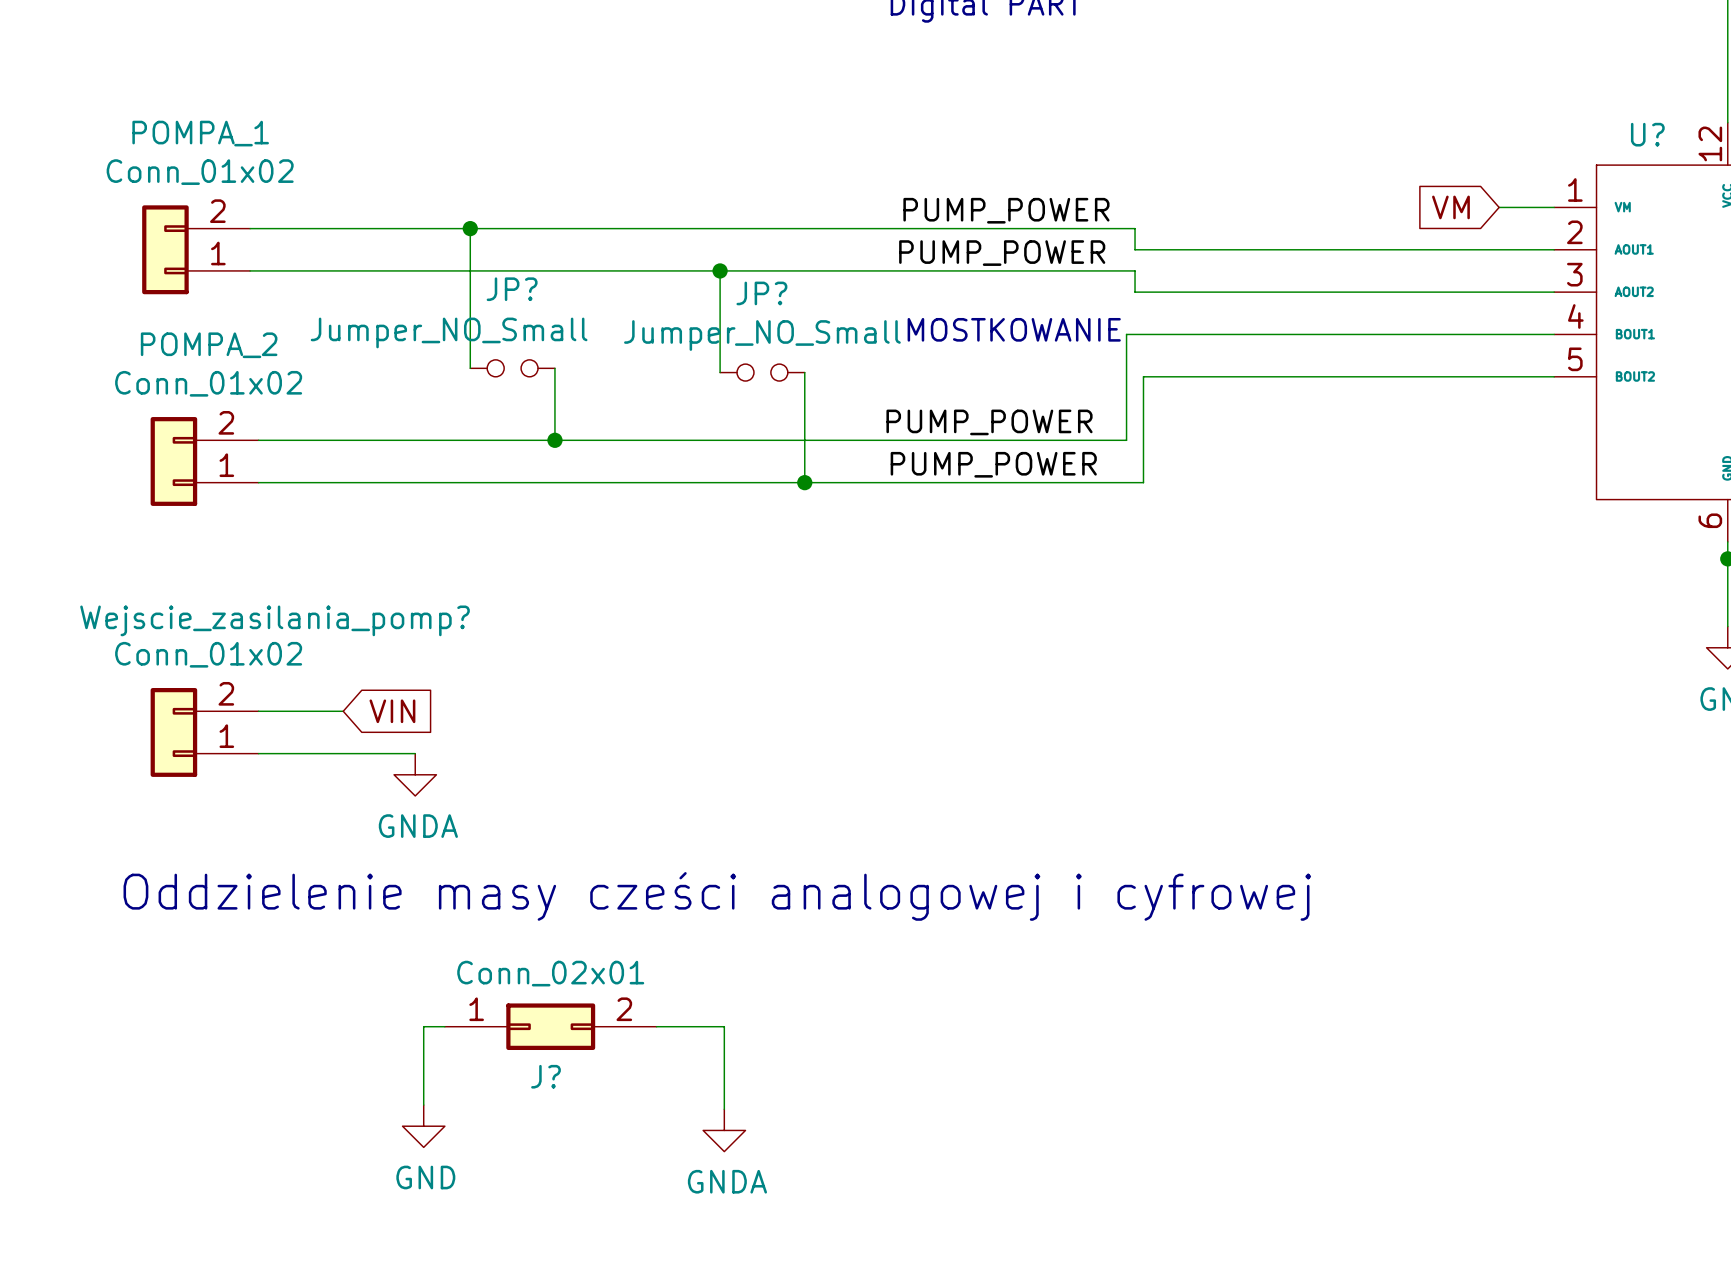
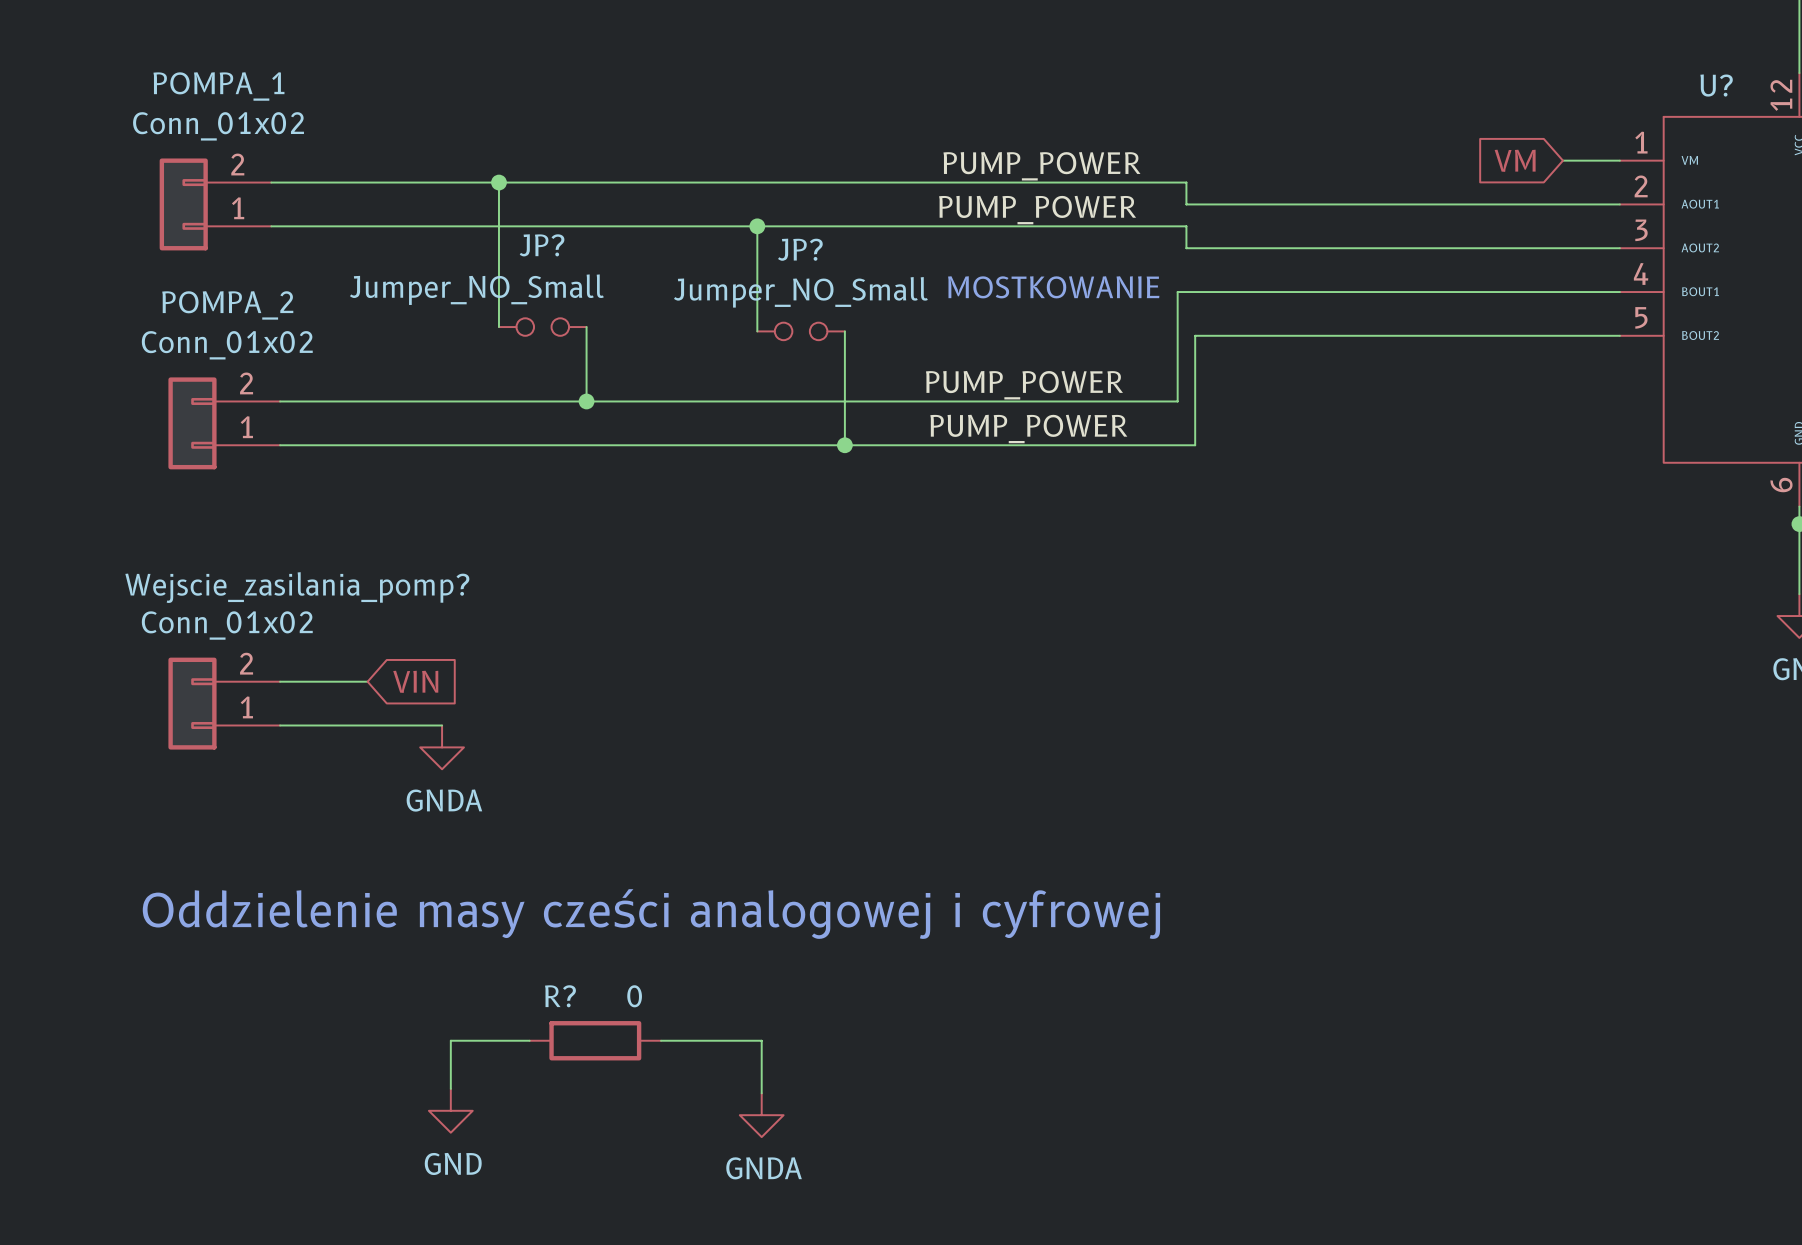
text position: Oddzielenie masy cześci analogowej i cyfrowej (717, 896) -> Oddzielenie masy cześci analogowej i cyfrowej (651, 914)
wire: (444, 1026) (423, 1026) (423, 1058) -> (529, 1040) (450, 1040)
J?: Conn_02x01 (550, 1026) -> none
wire: (656, 1026) (724, 1026) (724, 1058) -> (661, 1040) (761, 1040)
R?: none -> 0 (595, 1040)

